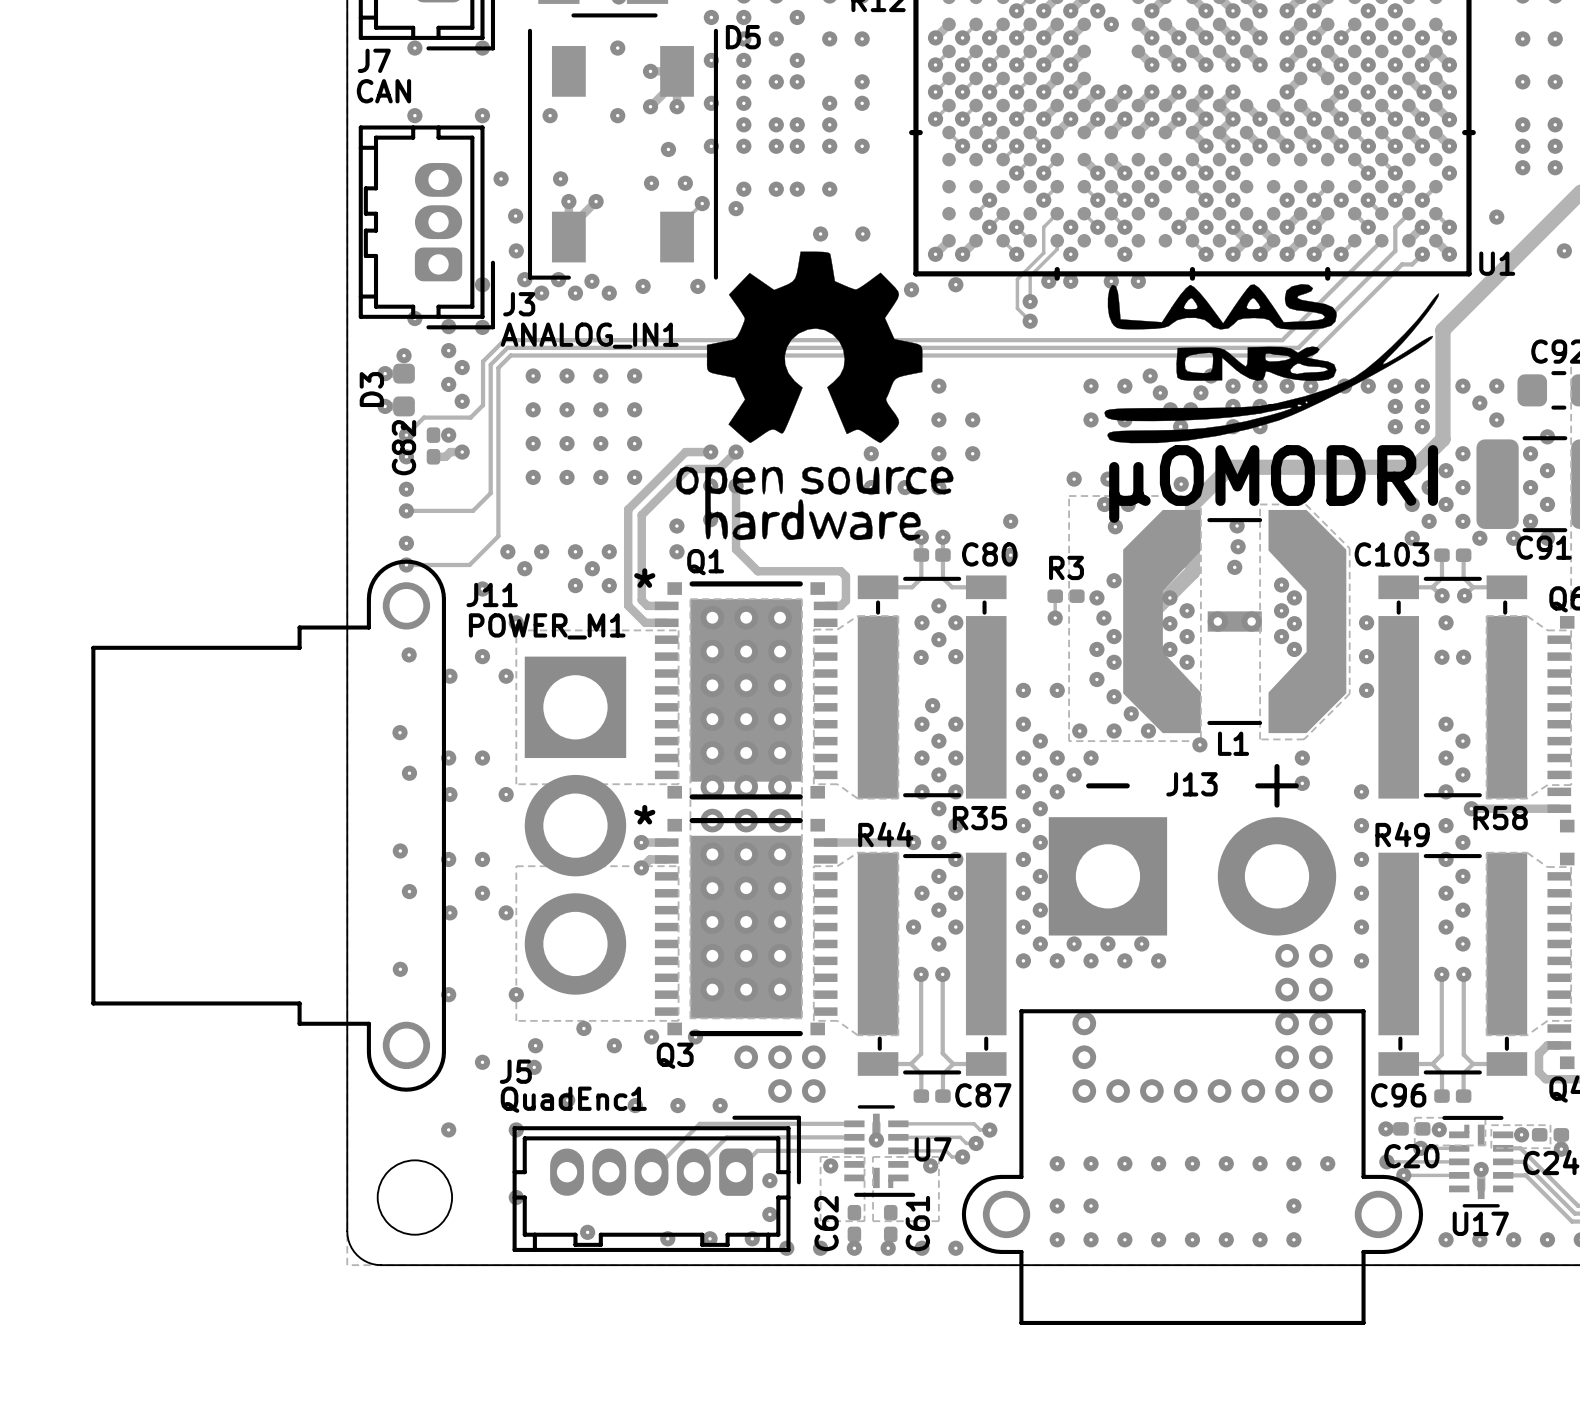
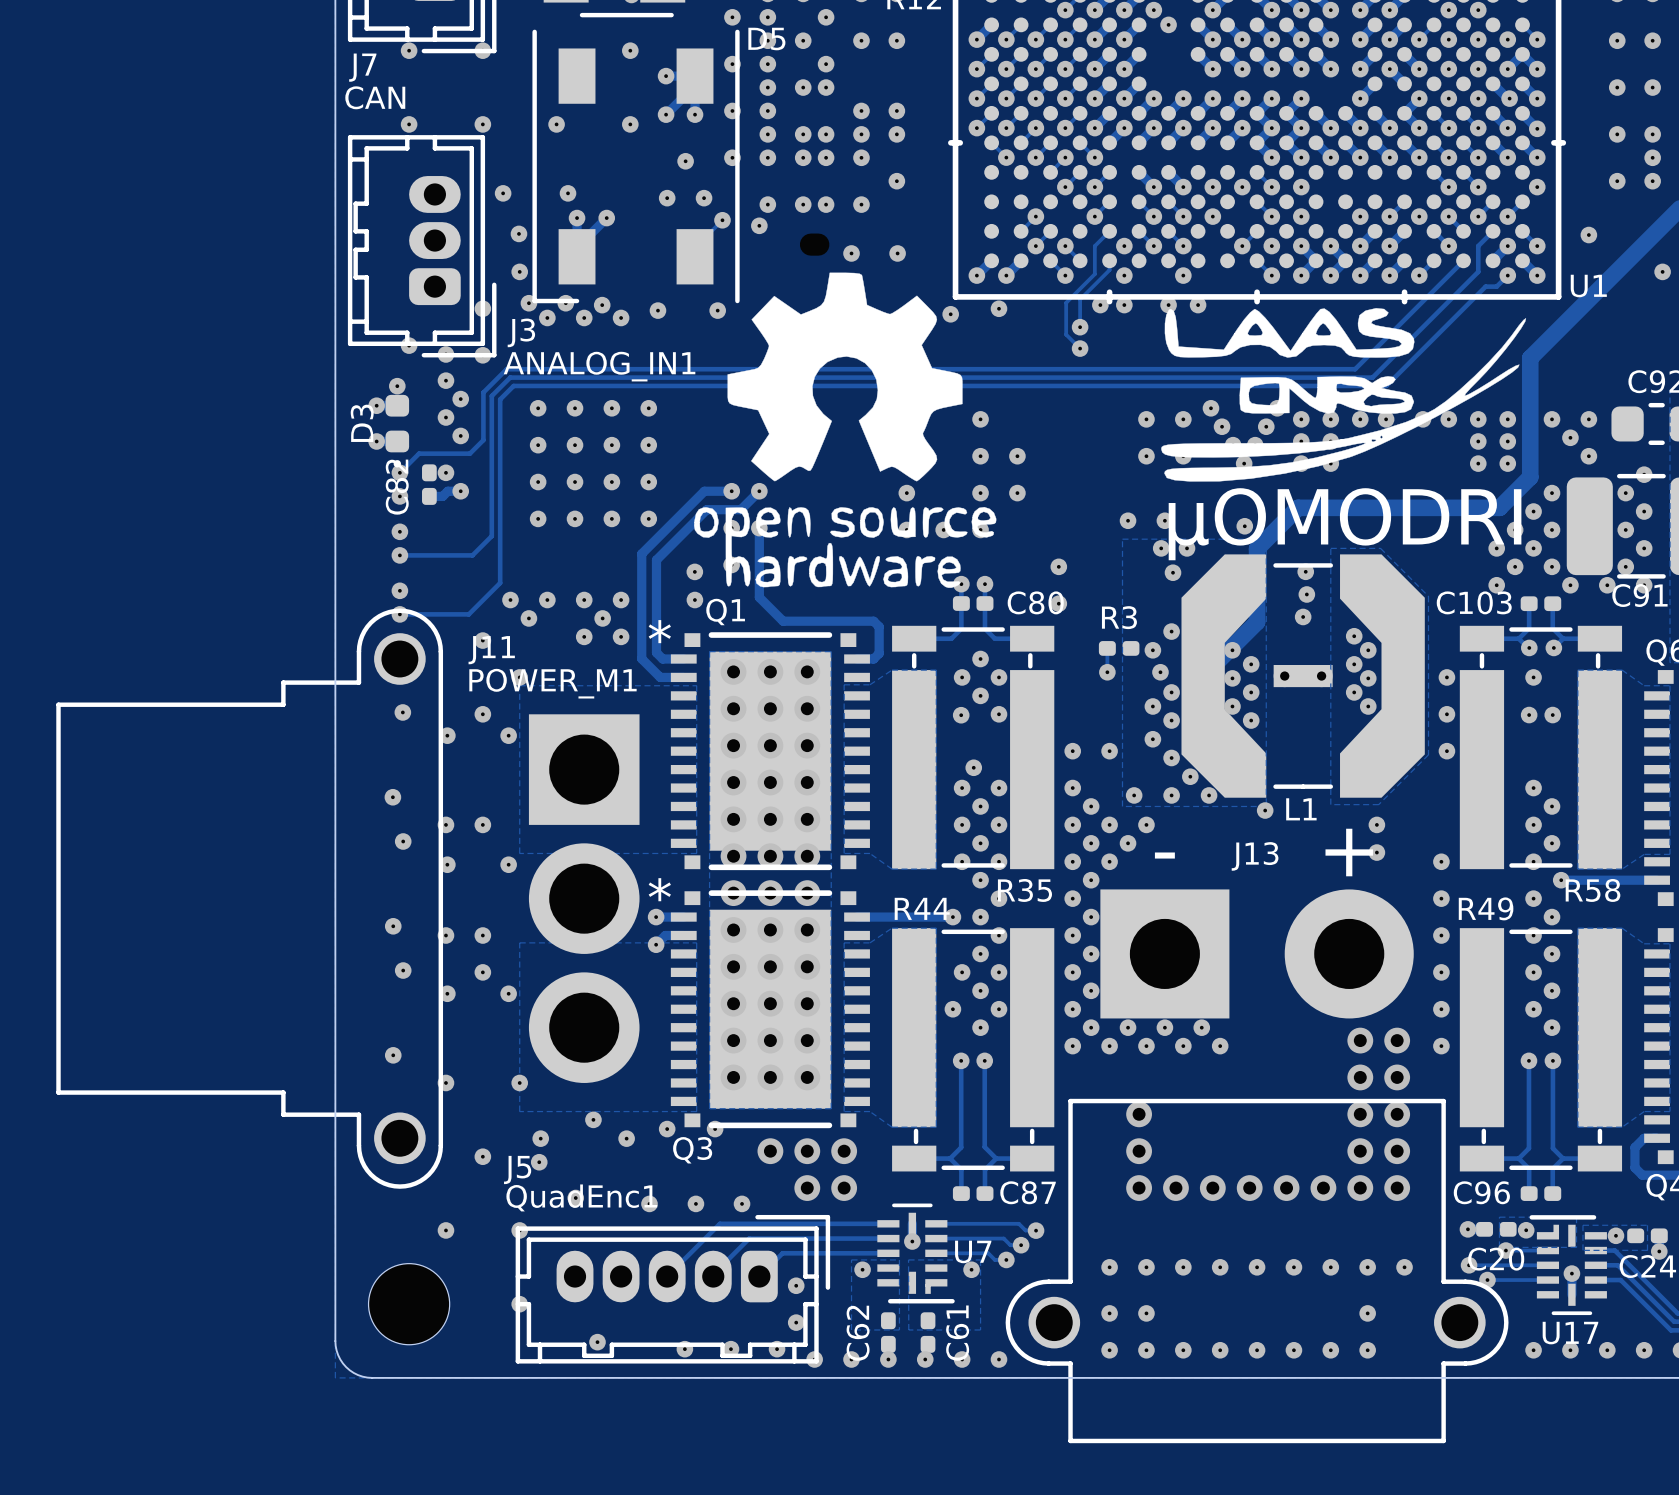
via: (862, 81) -> none
via: none -> (896, 134)
via: (862, 146) -> none
via: (1522, 146) -> none
via: none -> (896, 181)

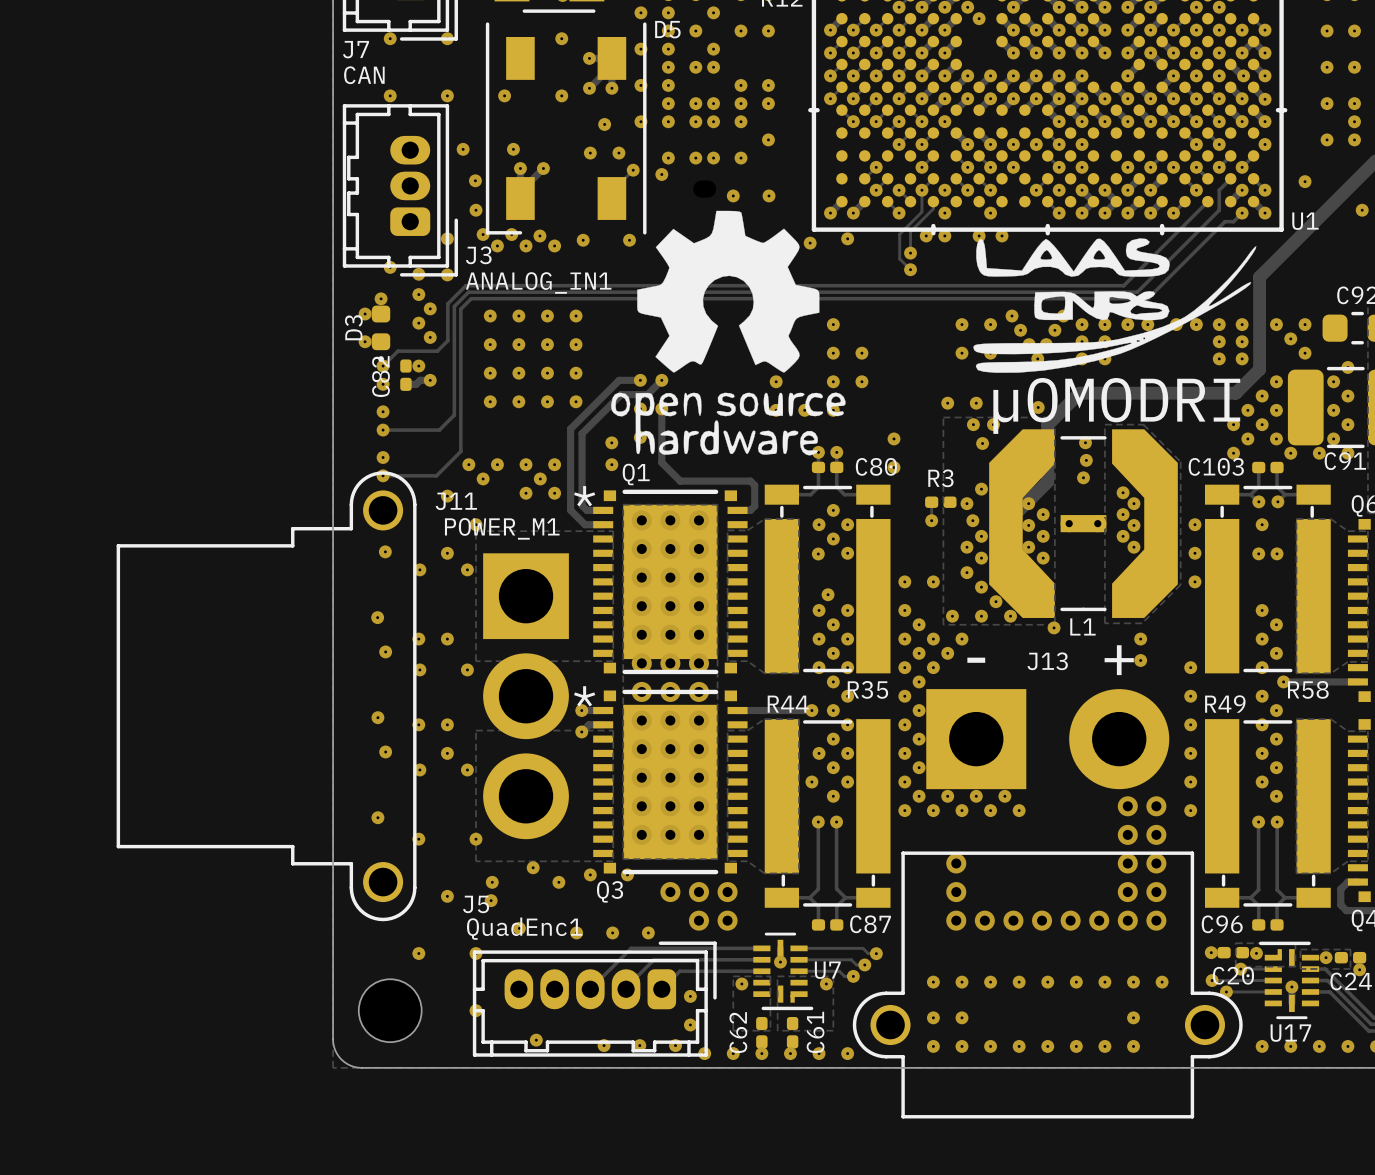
via: none -> (944, 121)
via: none -> (921, 190)

